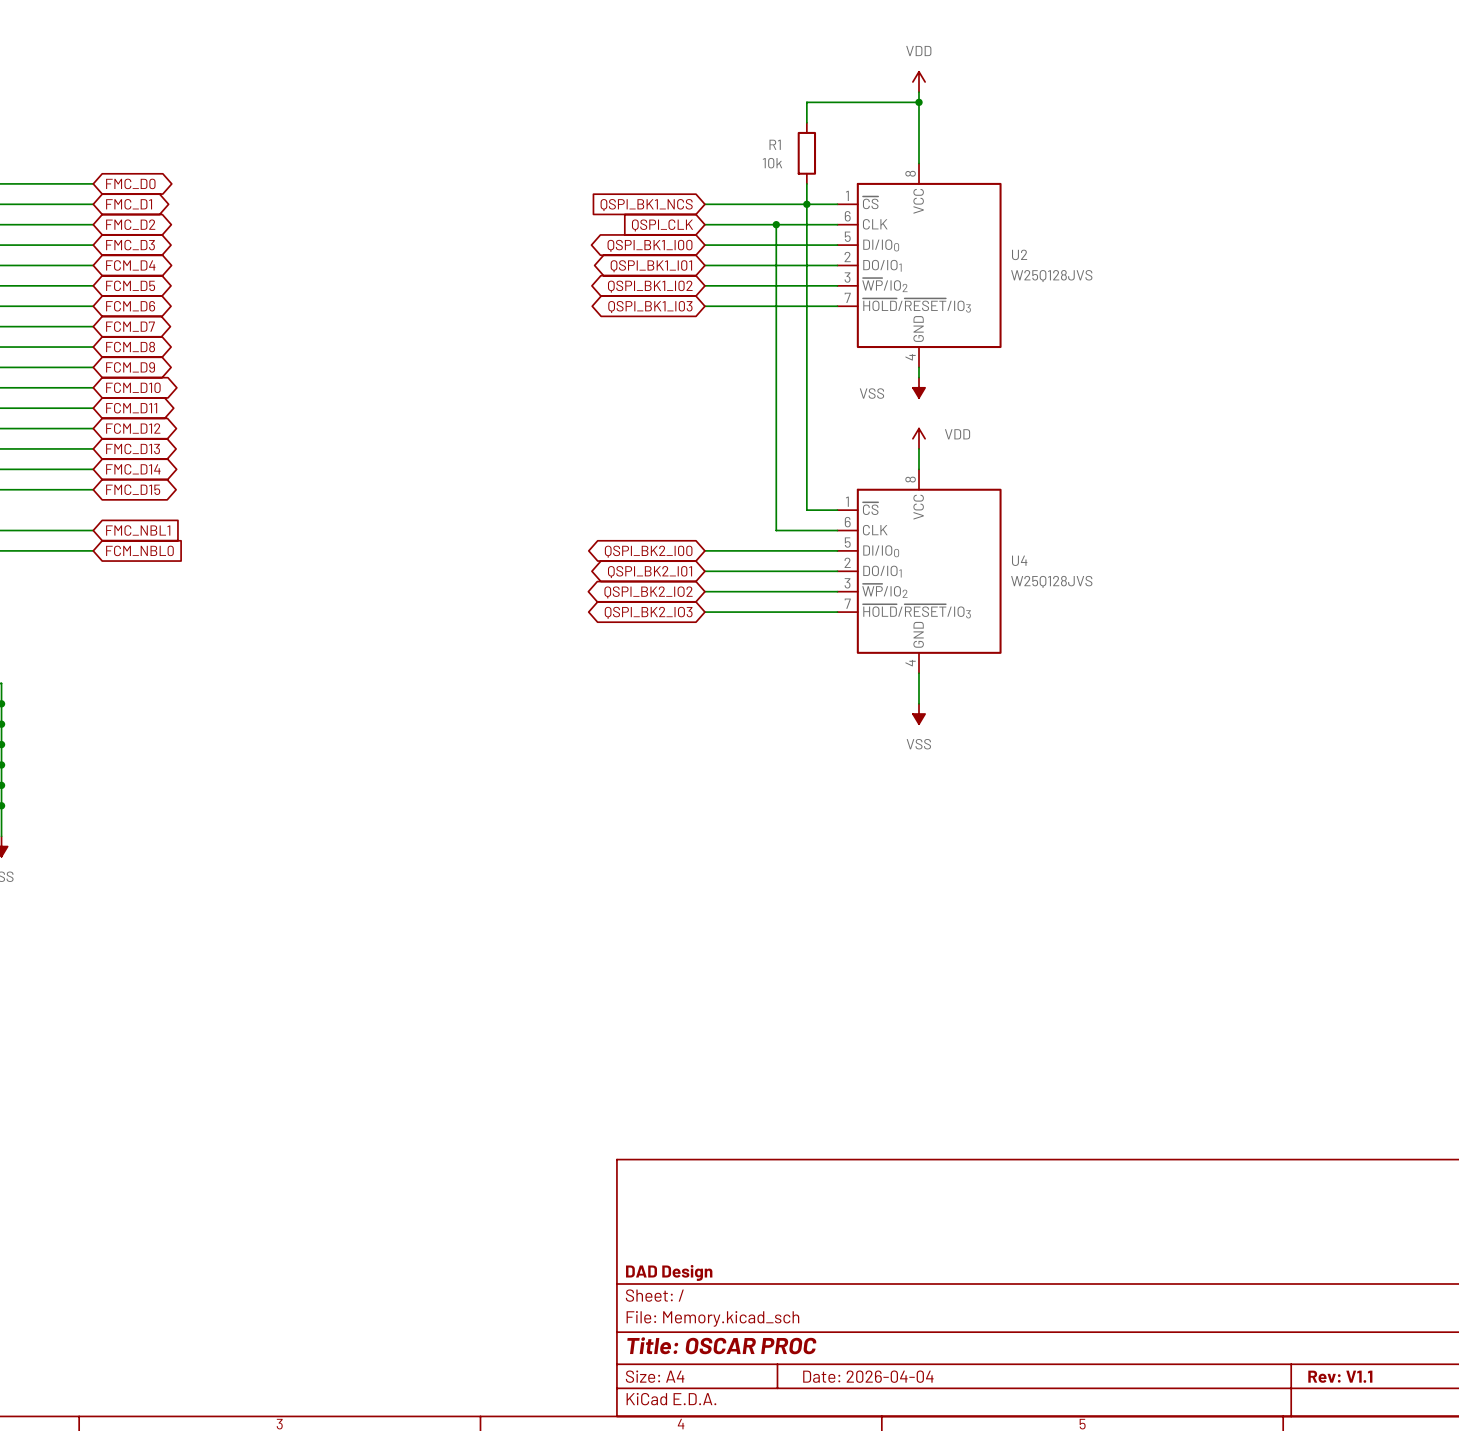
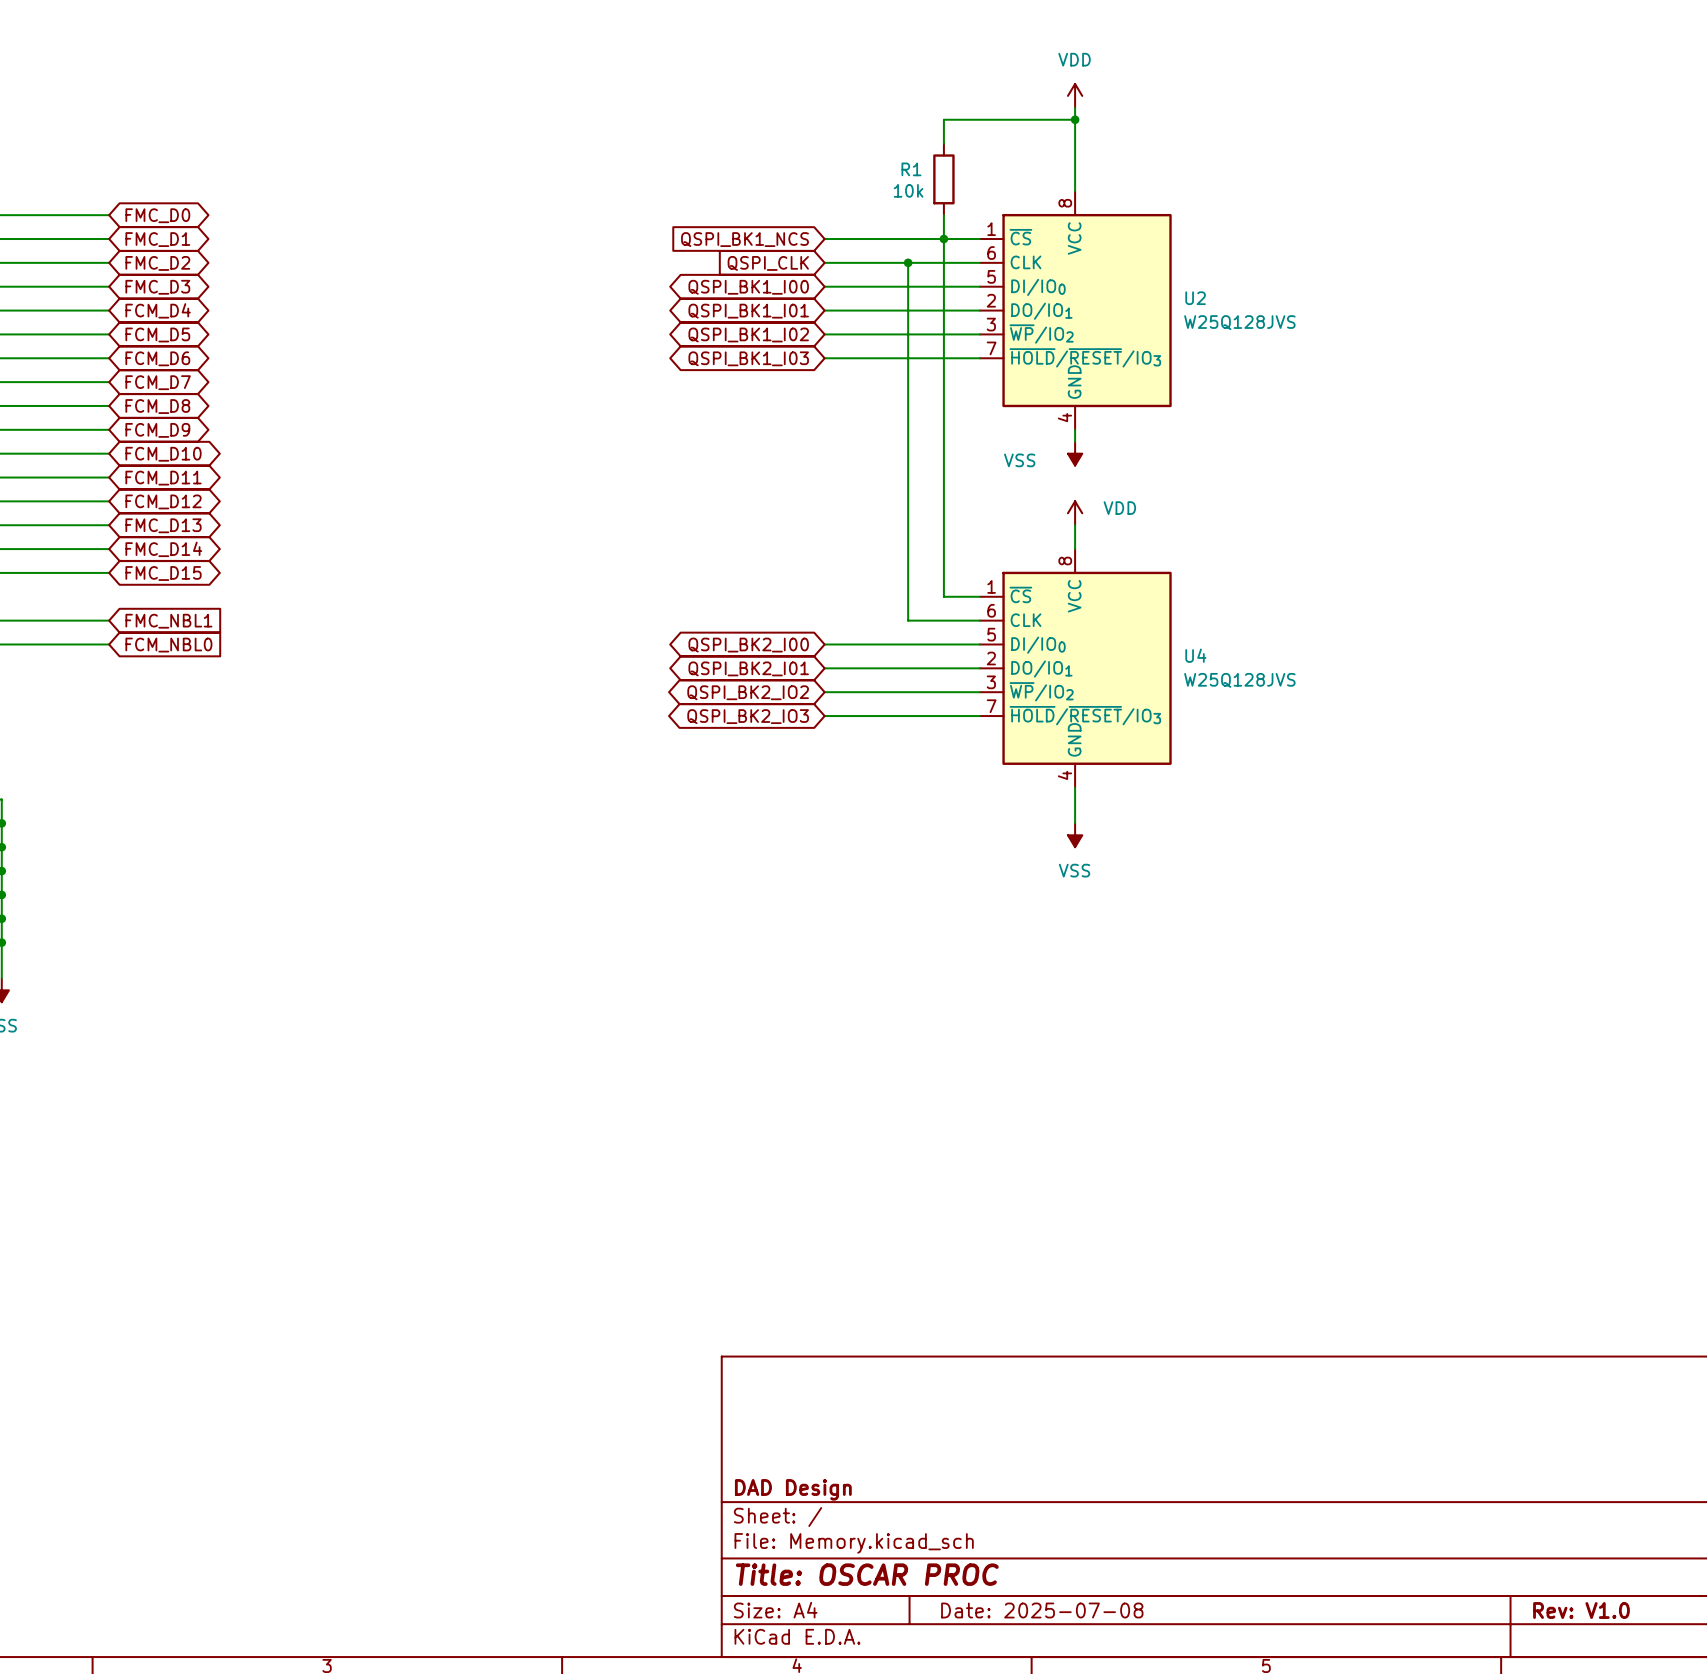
title block: Date: 2026-04-04 (868, 1376) -> Date: 2025-07-08 (1042, 1610)
title block: Rev: V1.1 (1340, 1376) -> Rev: V1.0 (1581, 1610)

